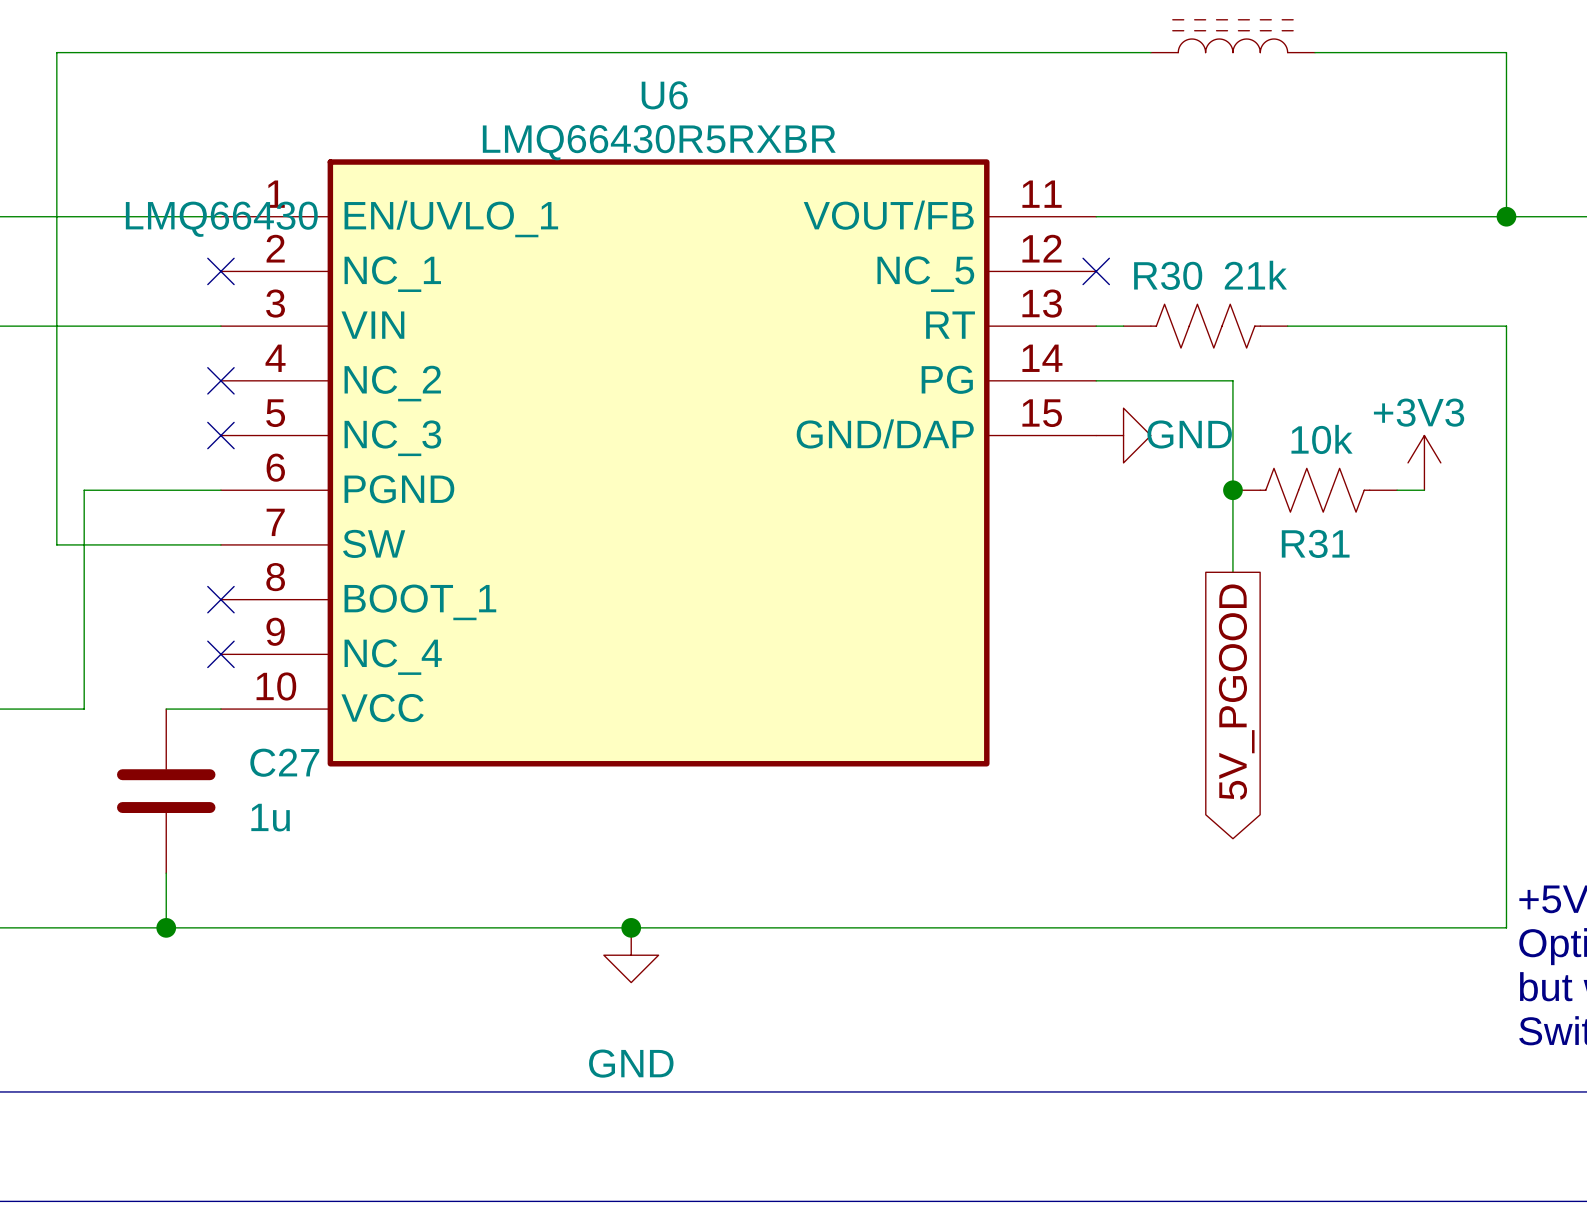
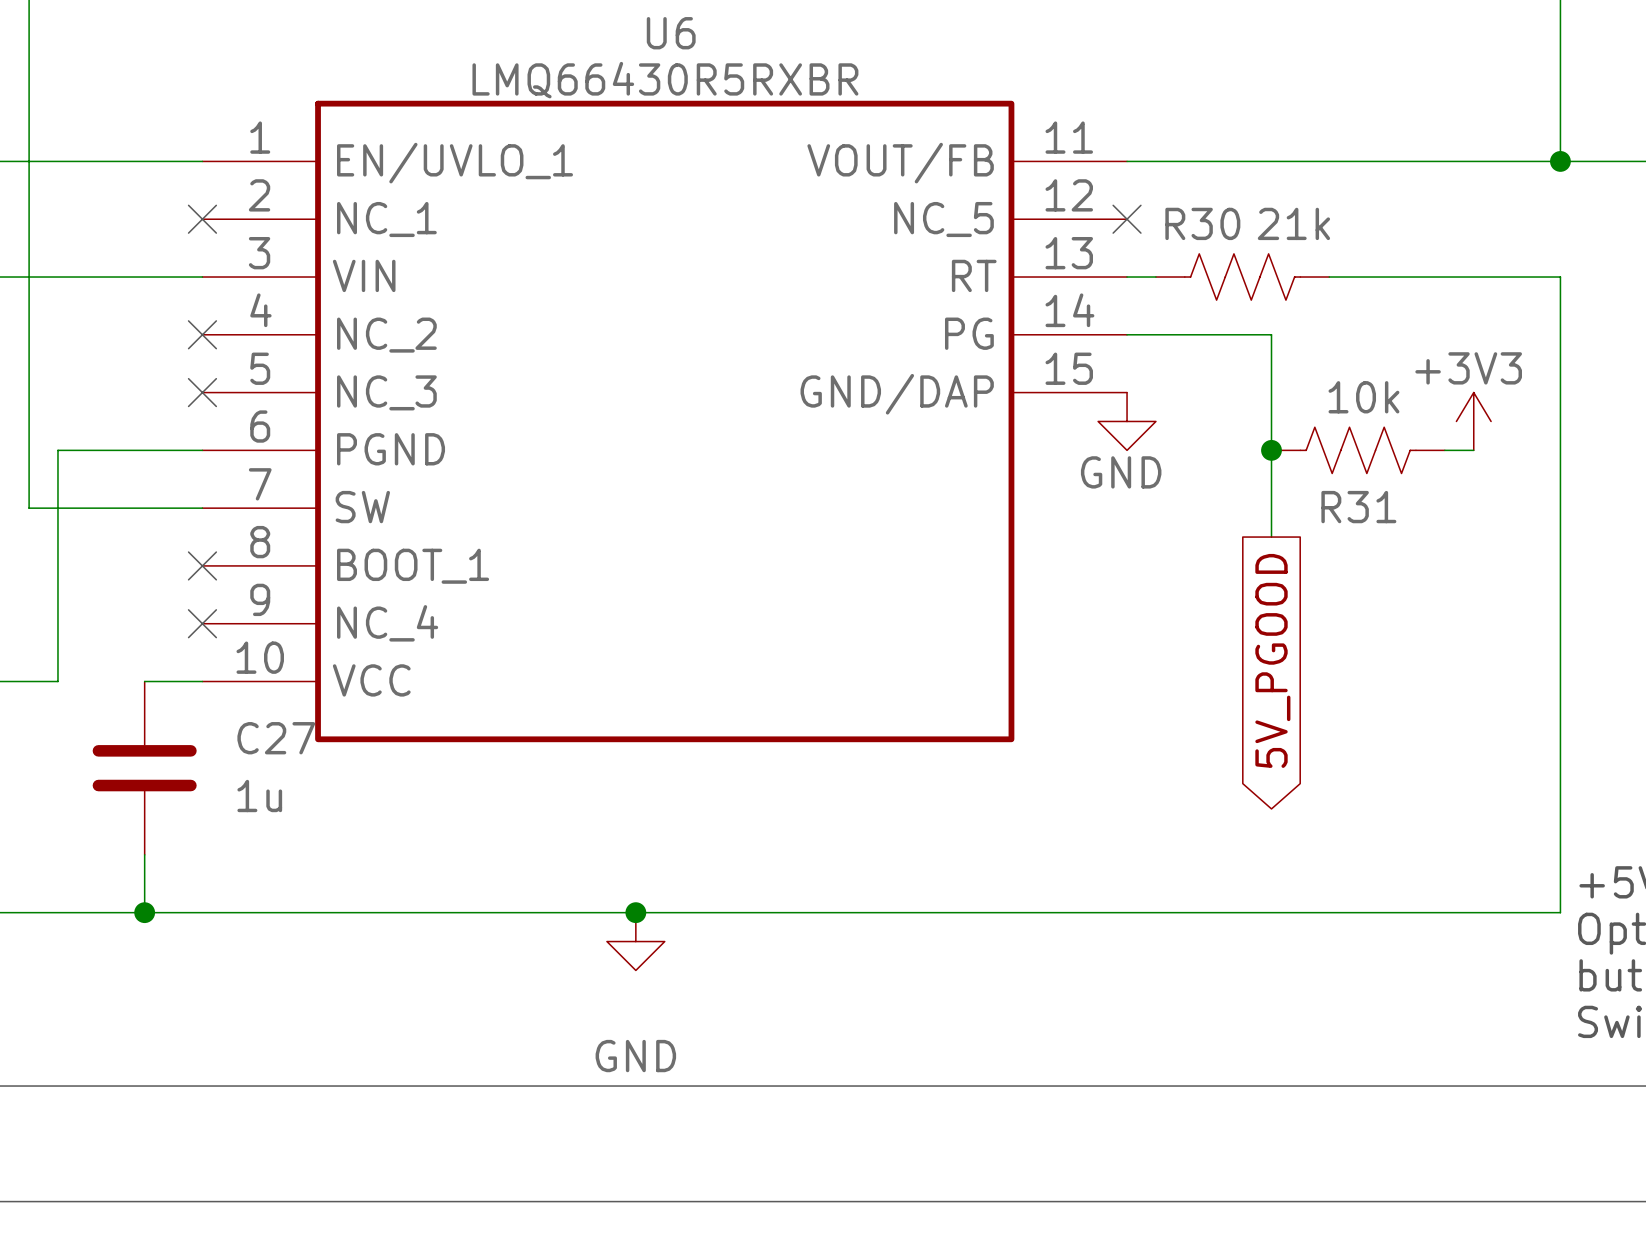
U6 text: LMQ66430 (221, 219) -> none
power symbol rotation: 0° (1123, 435) -> 90° clockwise (1127, 421)
power symbol position: GND (1123, 435) -> GND (1127, 421)

